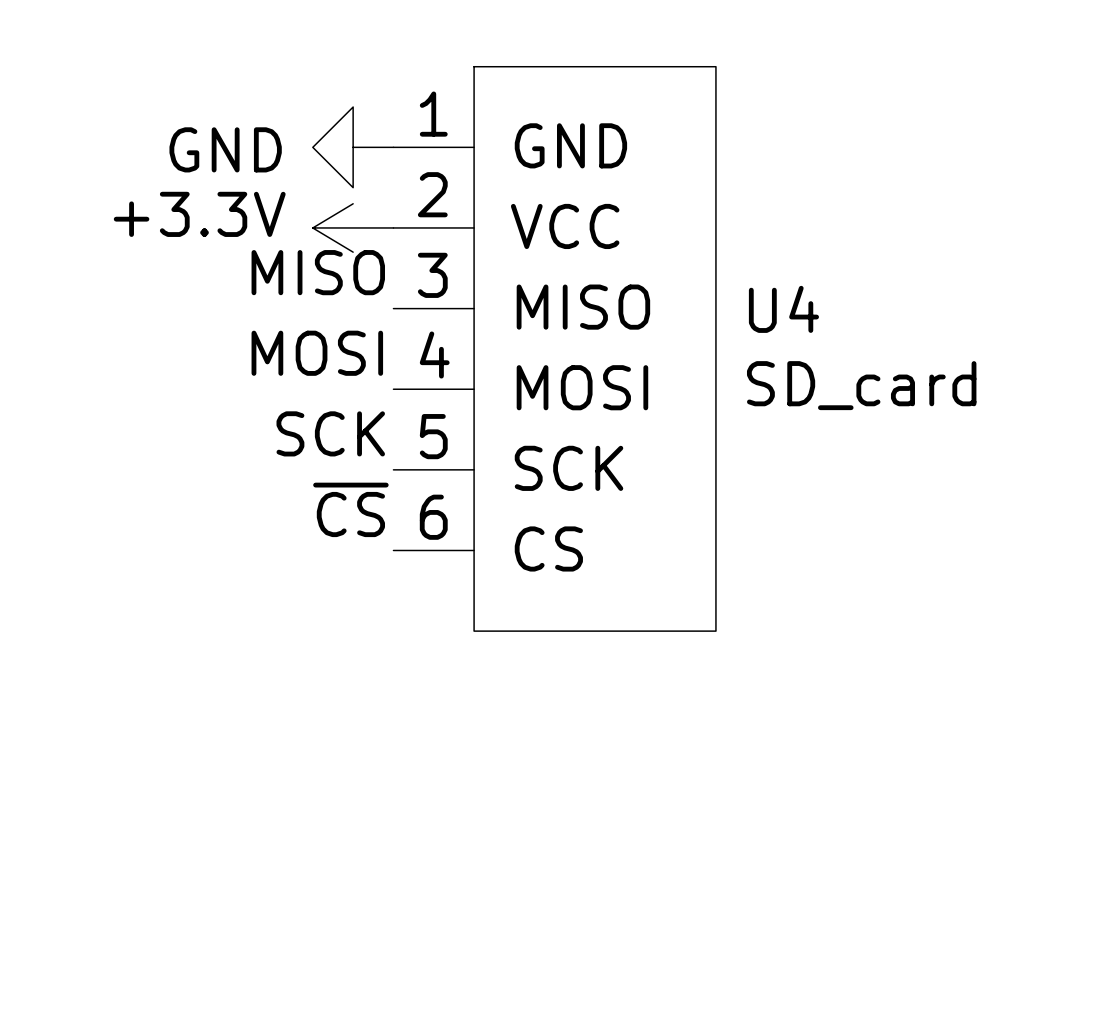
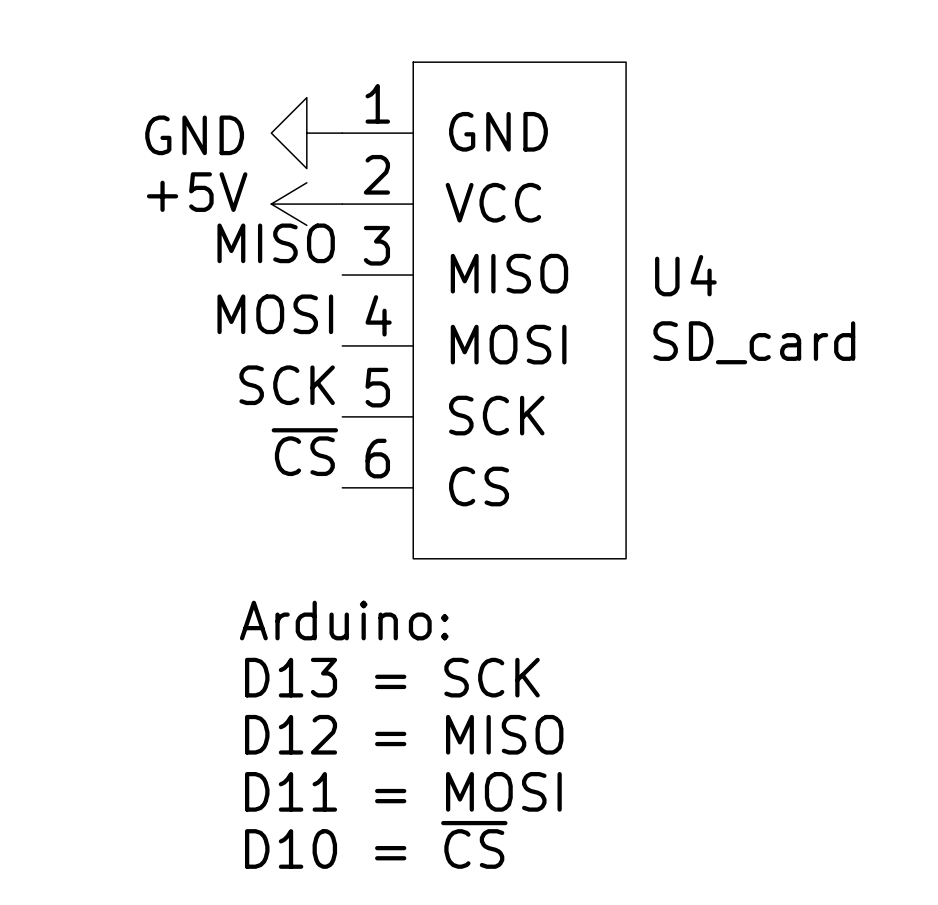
power symbol: +3.3V (353, 227) -> +5V (306, 204)
text: none -> Arduino: (344, 620)
text: none -> D13 = SCK (392, 677)
text: none -> D12 = MISO (404, 734)
text: none -> D11 = MOSI (403, 791)
text: none -> D10 = ~{CS} (376, 844)

